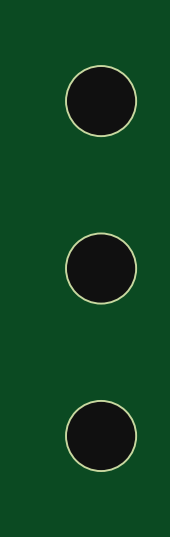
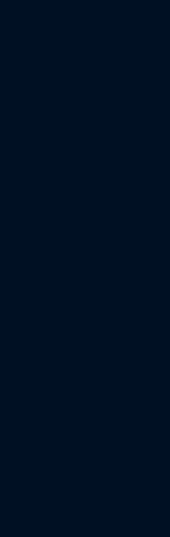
part: (101, 101) -> none
part: (101, 268) -> none
part: (101, 435) -> none

